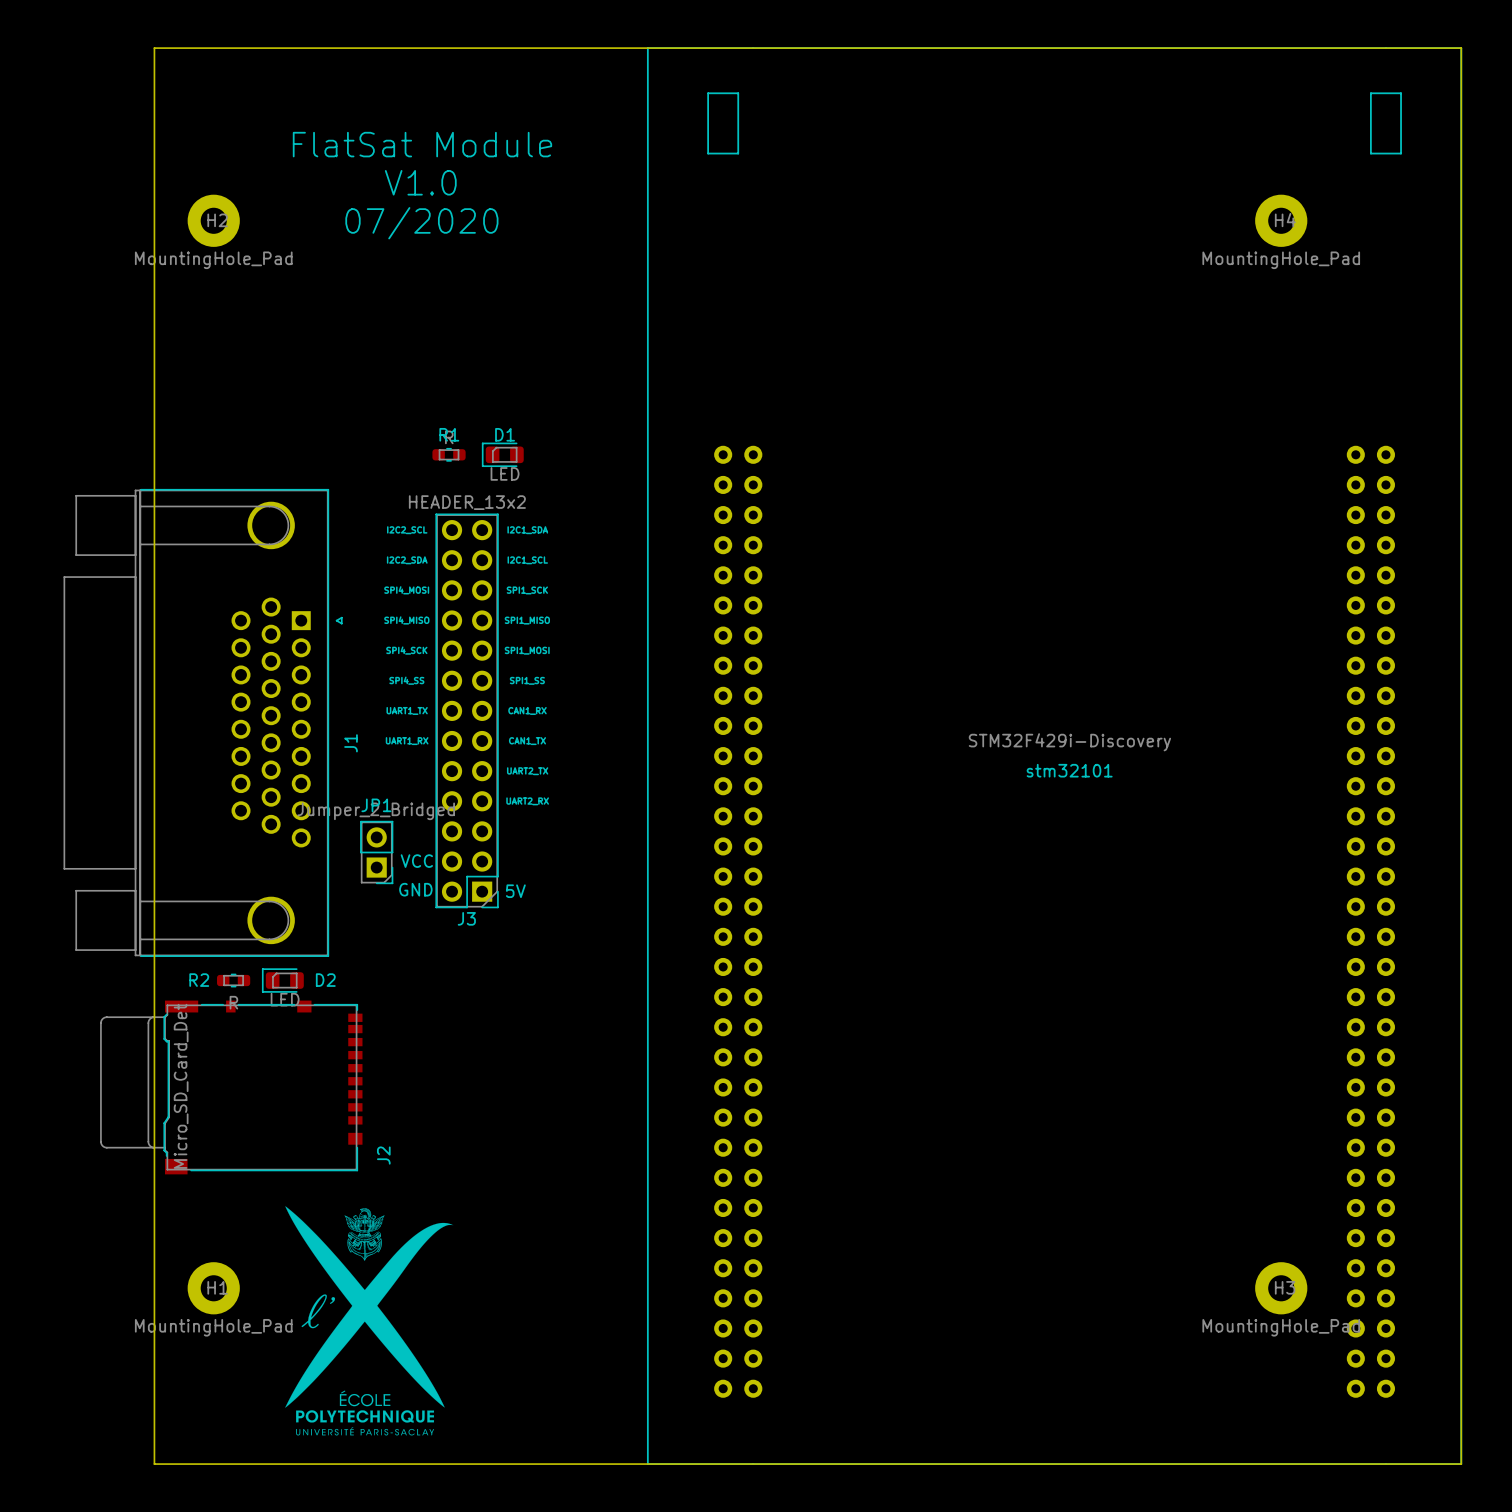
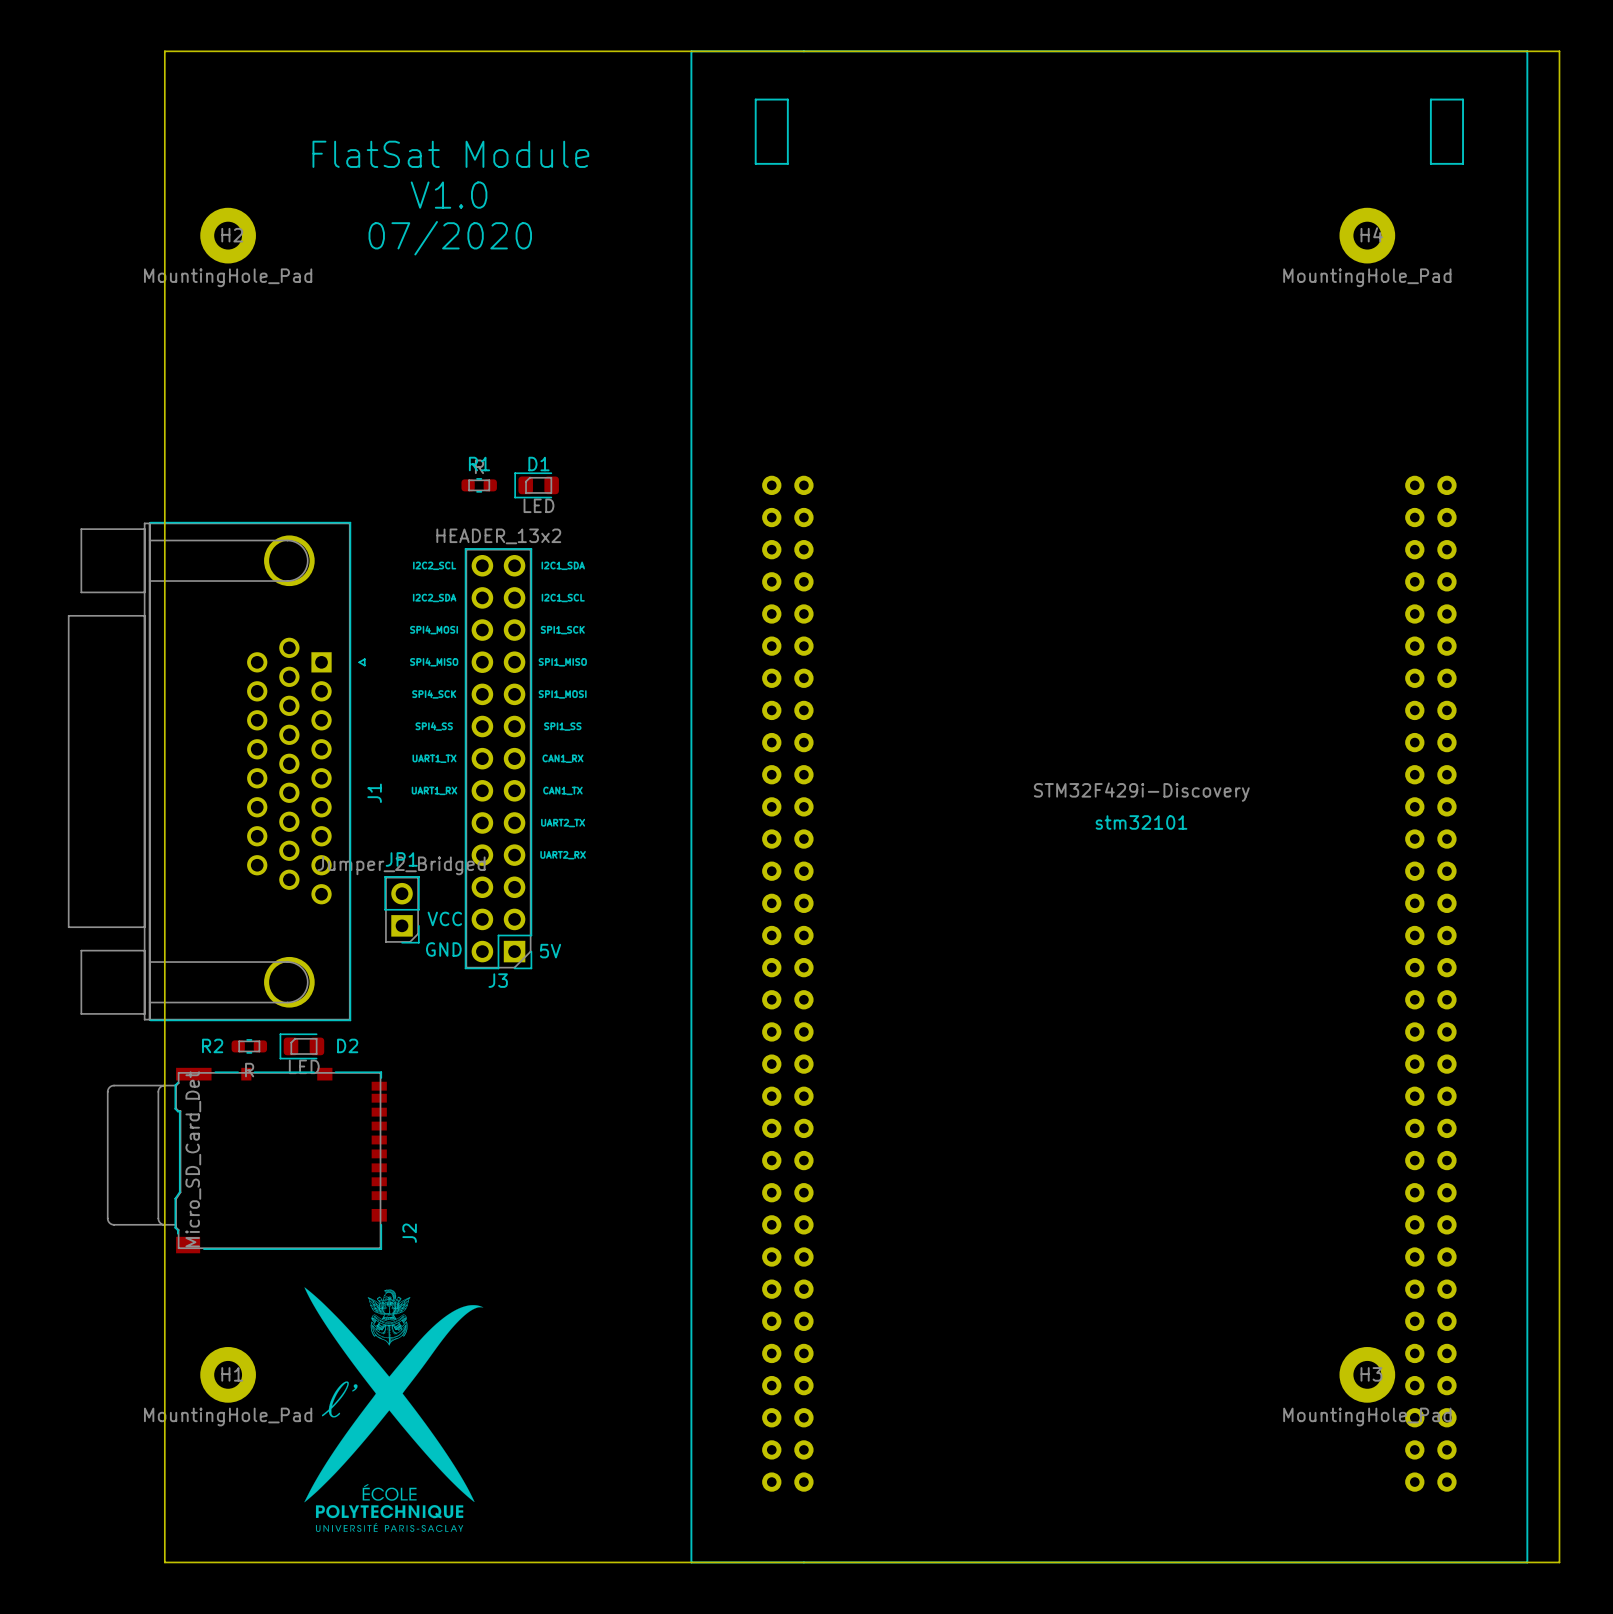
stm32101 footprint: [646, 47, 1463, 1465] -> [690, 50, 1529, 1564]

